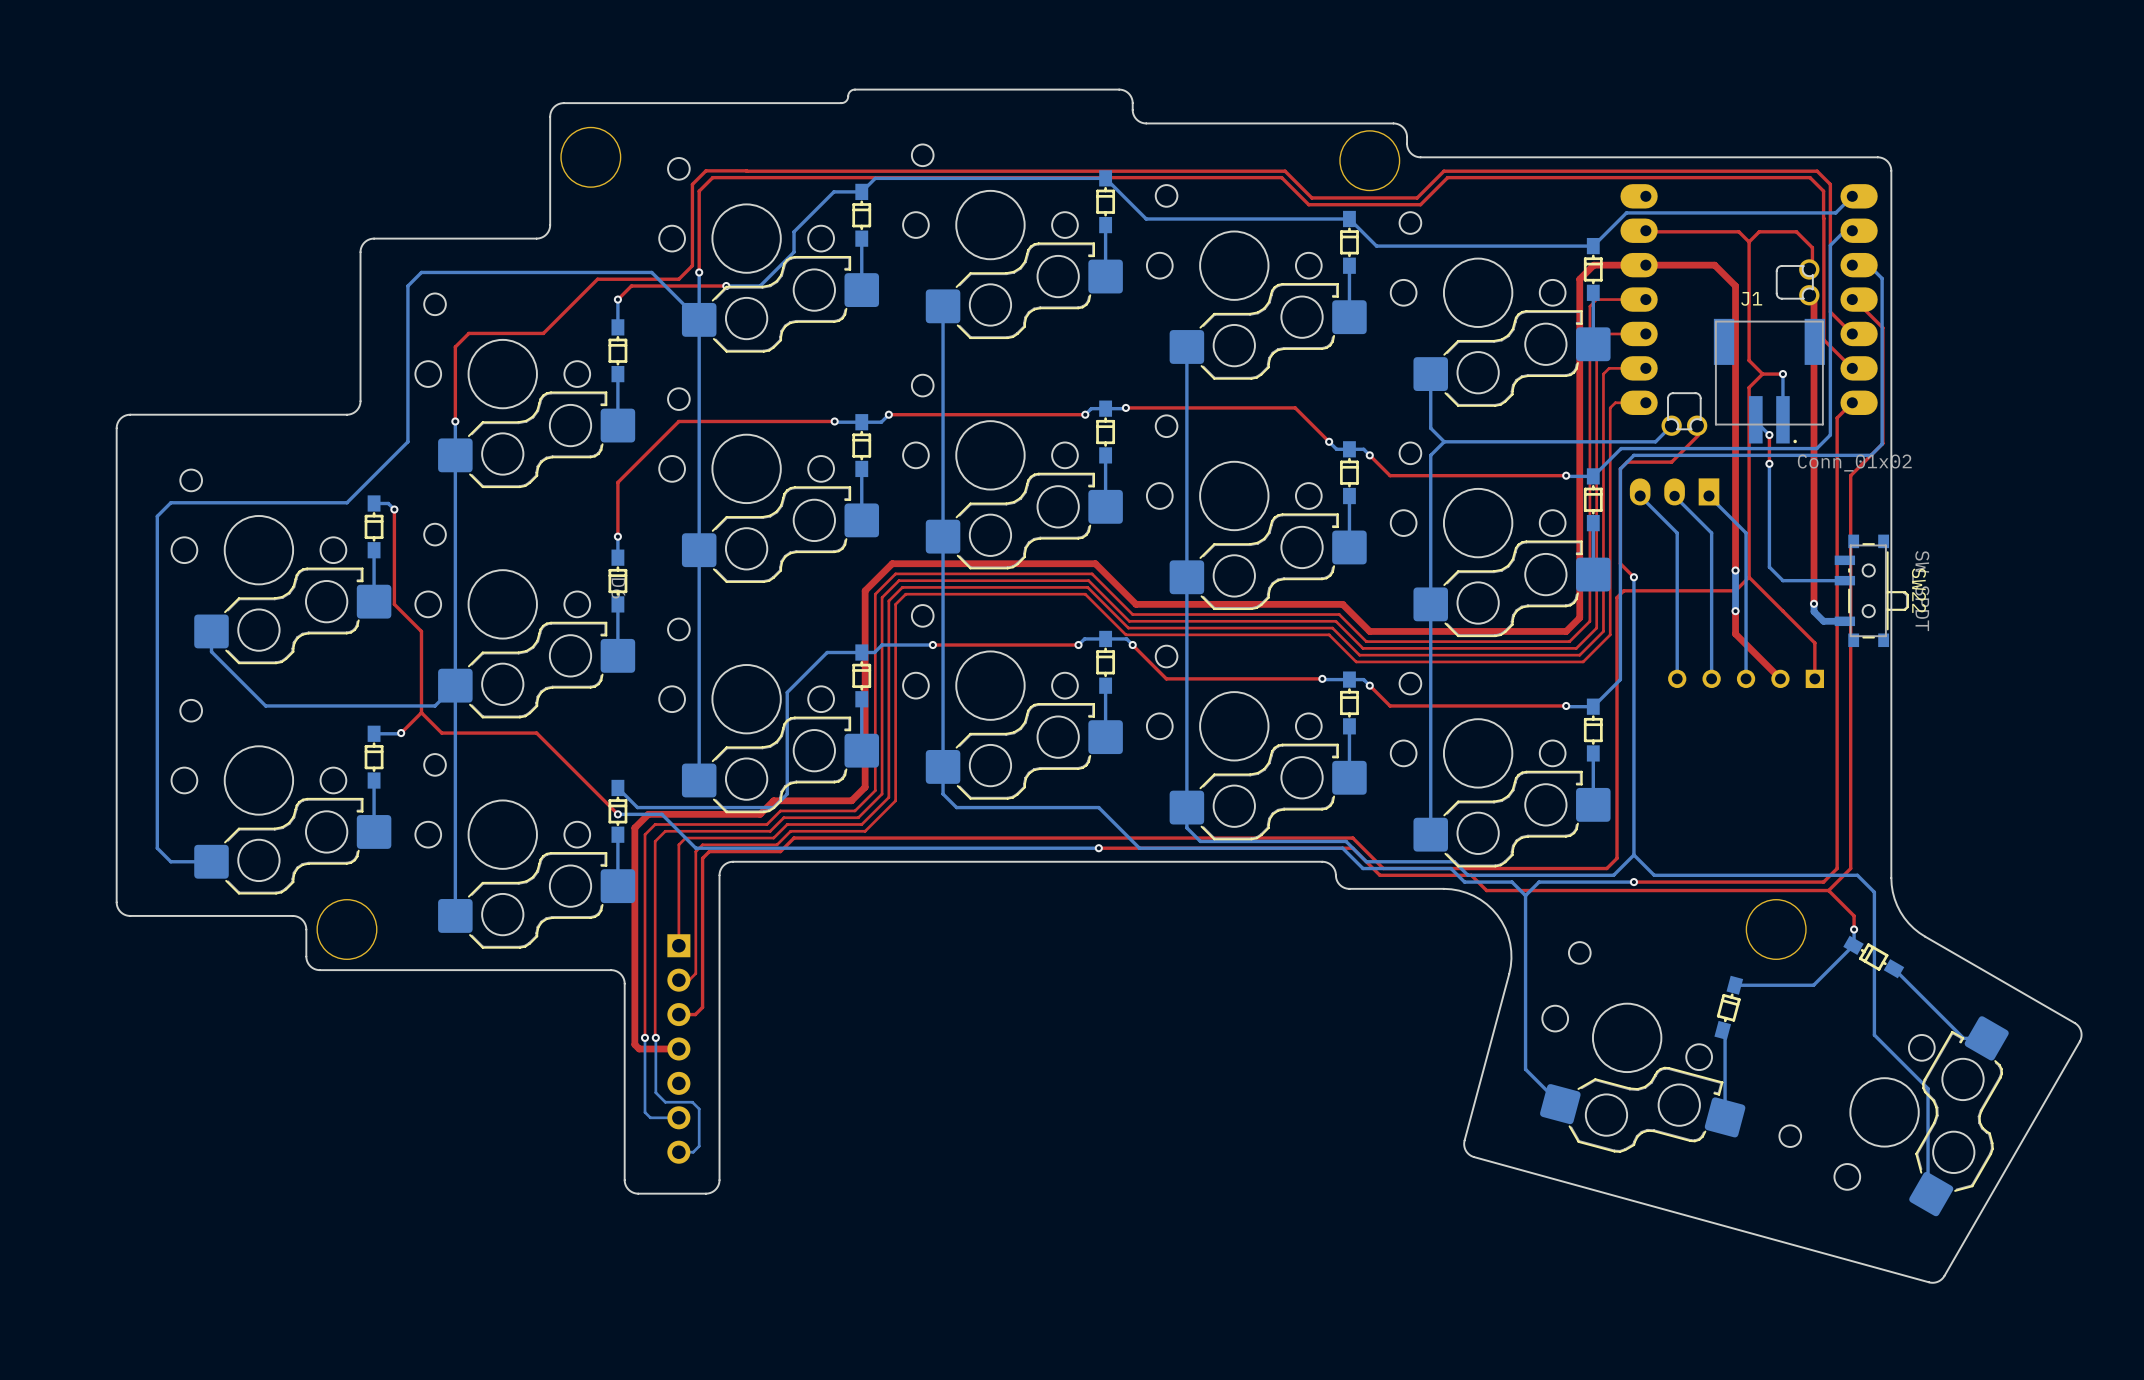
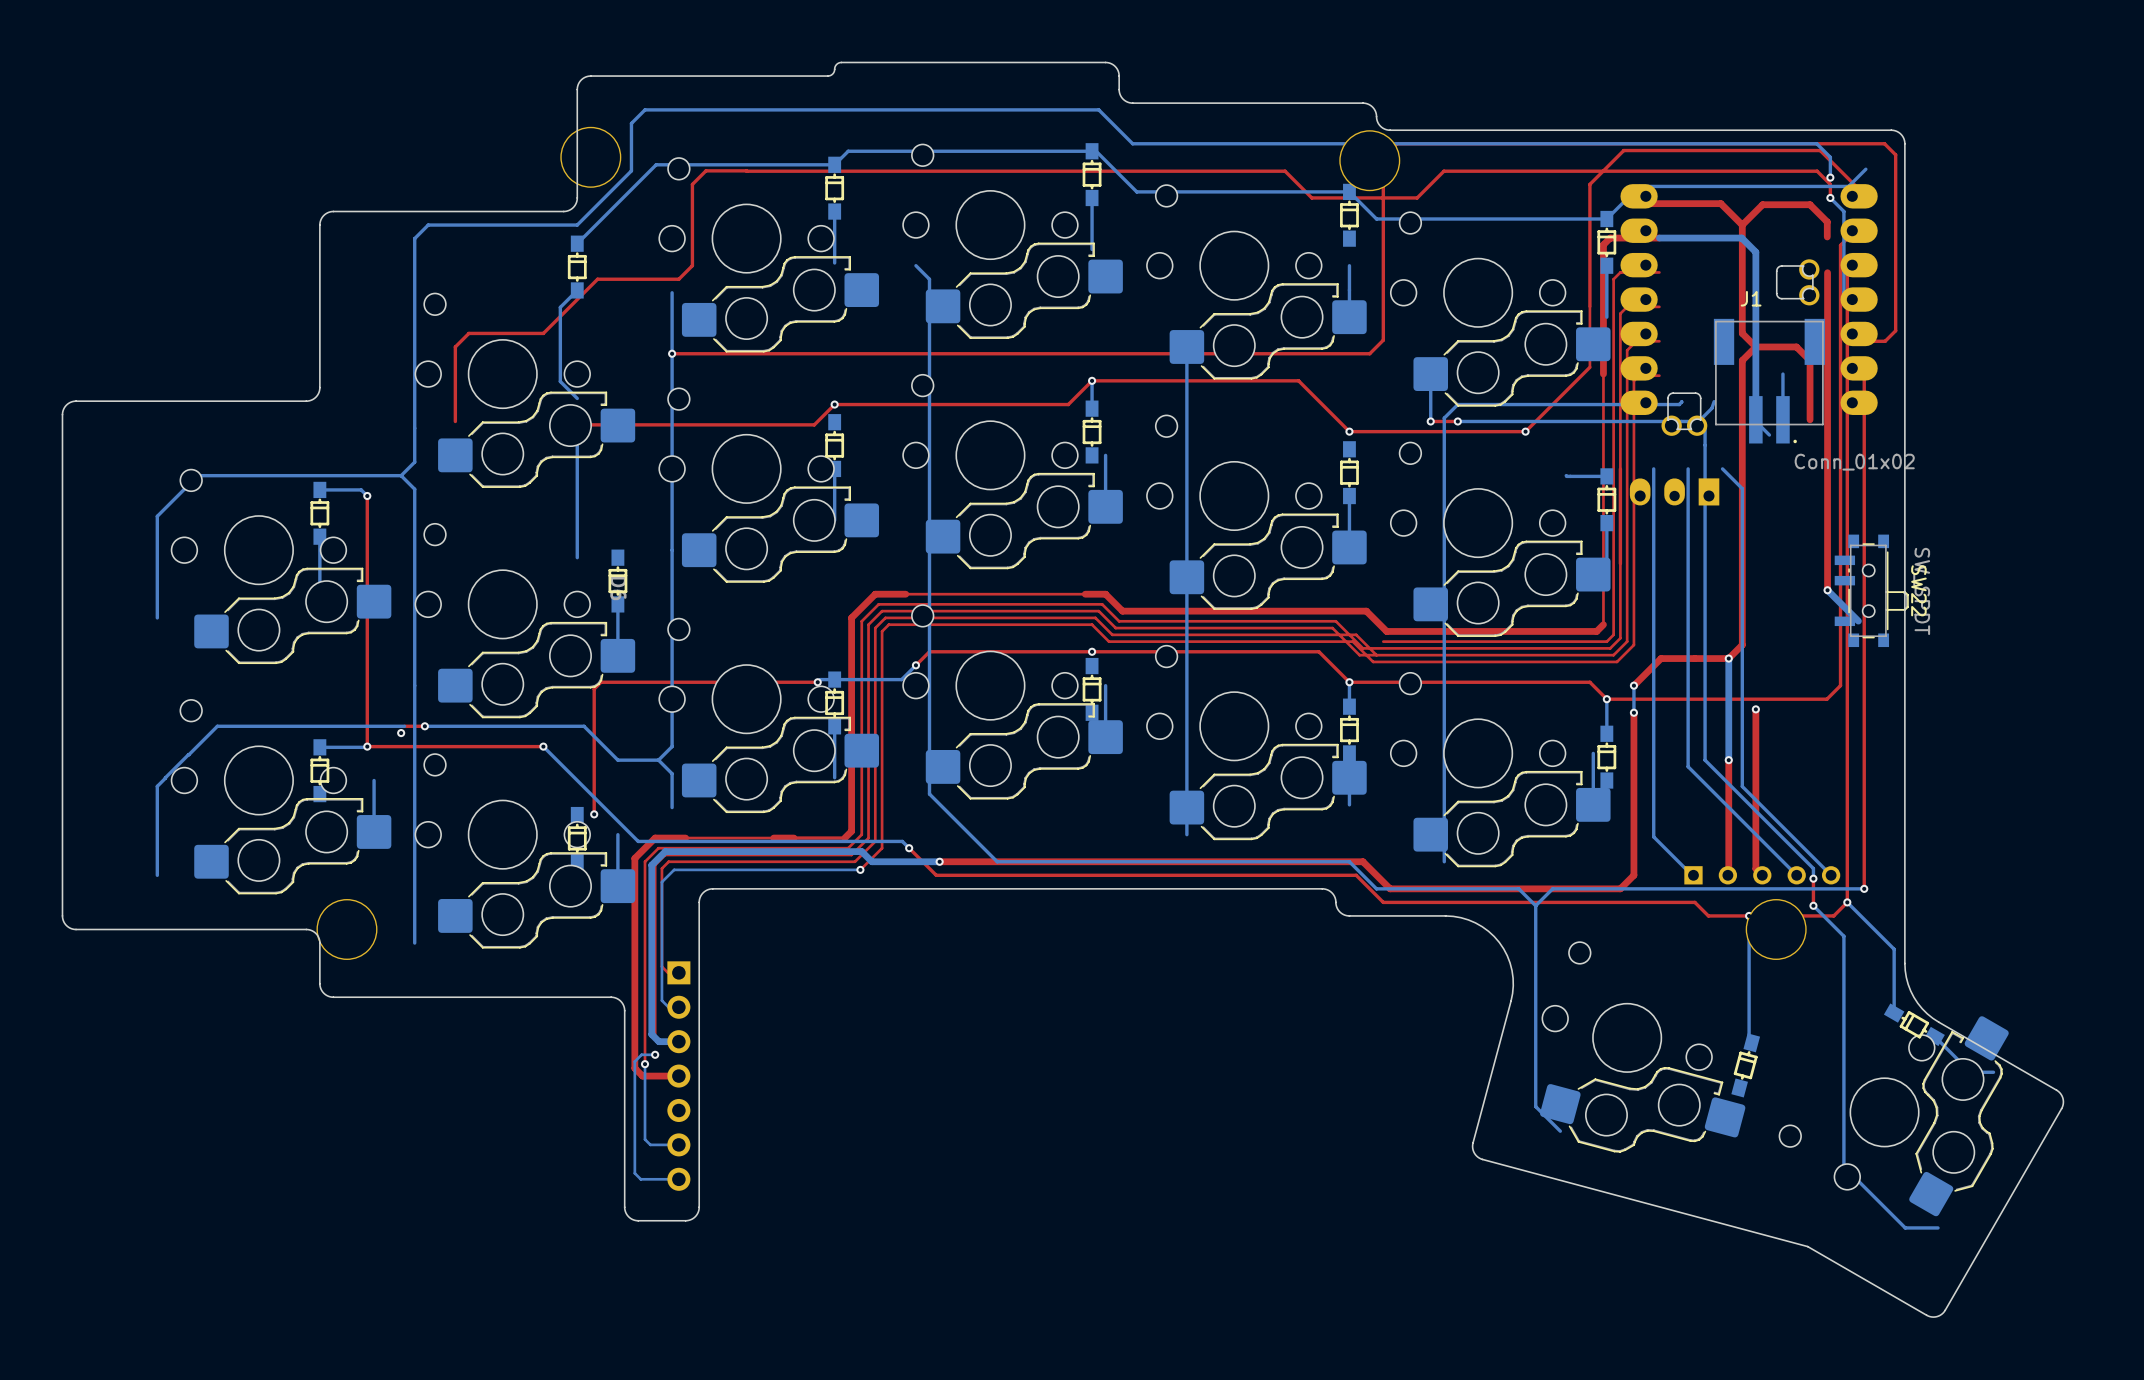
bottom track: none -> (1865, 169) (1848, 186) (1639, 186) (1606, 218) (1376, 218) (1349, 191) (1136, 191) (1096, 151) (848, 151) (834, 164) (656, 164) (577, 243)
bottom track: none -> (1830, 177) (1830, 157) (1816, 143) (1132, 143) (1098, 109) (645, 109) (631, 123) (631, 170) (577, 225) (428, 225) (414, 238) (414, 462) (401, 475)
via: none -> (1830, 177)
bottom track: (1852, 196) (1835, 212) (1626, 212) (1593, 246) (1376, 246) (1349, 218) (1146, 218) (1105, 178) (875, 178) (861, 191) (833, 191) (794, 231) (794, 252) (760, 286) (726, 286) -> none
top track: (1830, 197) (1830, 312) (1852, 333) -> none
bottom track: none -> (1830, 197) (1843, 211) (1843, 292) (1858, 306) (1865, 306)
via: none -> (1830, 197)
part position: (1105, 201) -> (1092, 174)
top track: none -> (1645, 203) (1720, 203) (1742, 225)
part position: (861, 215) -> (834, 188)
top track: (1823, 218) (1823, 191) (1810, 177) (1447, 177) (1420, 204) (1308, 204) (1281, 177) (712, 177) (699, 191) (699, 272) -> none
top track: (1823, 218) (1823, 339) (1852, 368) -> none
bottom track: (1105, 225) (1105, 276) -> (1092, 198) (1092, 249)
top track: none -> (1742, 225) (1742, 333) (1755, 346)
top track: none -> (1742, 225) (1762, 204) (1810, 204) (1827, 221) (1827, 236)
top track: (1645, 230) (1738, 231) (1749, 241) -> none
bottom track: (1852, 230) (1845, 230) (1830, 245) (1830, 435) (1816, 448) (1621, 448) (1593, 476) -> (1606, 476) (1593, 476)
bottom track: (861, 238) (861, 290) -> (834, 211) (834, 262)
bottom track: none -> (1659, 238) (1741, 238) (1755, 252) (1755, 419)
top track: none -> (1865, 238) (1847, 238) (1840, 245) (1840, 685) (1826, 699) (1606, 699) (1589, 682) (1349, 682) (1318, 651) (929, 651) (915, 665)
top track: (1749, 241) (1749, 360) (1762, 374) -> none
top track: (1749, 241) (1759, 231) (1796, 231) (1812, 247) (1812, 266) -> none
part position: (1349, 242) -> (1349, 215)
bottom track: (1852, 265) (1868, 265) (1882, 278) (1882, 444) (1871, 455) (1633, 455) (1620, 468) (1620, 679) (1593, 706) (1566, 705) -> none
part position: (1593, 269) -> (1606, 242)
bottom track: (699, 272) (699, 780) -> none
via: (699, 272) -> none
top track: none -> (1827, 272) (1827, 590)
top track: none -> (1865, 272) (1850, 272) (1847, 275) (1847, 902) (1833, 915) (1708, 915) (1694, 902) (1383, 902) (1356, 875) (936, 875) (909, 848)
top track: (726, 286) (631, 286) (617, 299) -> none
via: (726, 286) -> none
bottom track: none -> (577, 290) (560, 307) (560, 381) (577, 398)
bottom track: none -> (672, 292) (672, 746) (658, 760)
bottom track: (1593, 292) (1593, 344) -> (1606, 265) (1606, 317)
bottom track: (617, 299) (617, 327) -> none
via: (617, 299) -> none
top track: (1645, 299) (1596, 299) (1589, 306) -> (1865, 203) (1865, 196) (1820, 150) (1623, 150) (1589, 184) (1589, 306)
top track: (1814, 299) (1814, 603) -> none
top track: (1852, 299) (1854, 299) (1882, 327) (1882, 443) (1850, 475) (1850, 868) (1828, 890) -> none
bottom track: (943, 306) (943, 794) (956, 807) (1098, 807) (1139, 848) (1342, 848) (1363, 868) (1451, 868) (1464, 882) (1512, 882) (1518, 888) -> (915, 265) (929, 279) (929, 794) (997, 861) (1349, 861) (1376, 888) (1518, 888)
bottom track: (699, 319) (651, 272) (421, 272) (407, 286) (407, 441) (346, 502) (170, 502) -> (401, 475) (197, 475) (170, 502)
top track: (1645, 333) (1602, 333) (1596, 340) (1596, 628) (1576, 648) -> none
top track: none -> (1659, 341) (1636, 341) (1627, 350) (1627, 641) (1613, 655) (1579, 655)
top track: none -> (1865, 341) (1885, 341) (1895, 330) (1895, 154) (1884, 143) (1396, 143) (1383, 157) (1383, 340) (1369, 353) (672, 353)
top track: none -> (1755, 346) (1796, 346) (1810, 360) (1810, 419)
top track: none -> (1755, 346) (1742, 360) (1742, 645) (1728, 658) (1661, 658) (1633, 685)
part position: (617, 350) -> (577, 267)
via: none -> (672, 353)
top track: (1589, 367) (1589, 621) (1569, 641) -> (1659, 272) (1620, 272) (1613, 279) (1613, 634) (1606, 641) (1569, 641)
top track: none -> (1589, 367) (1525, 431) (1349, 431) (1298, 380) (1092, 380) (1068, 404) (834, 404) (814, 424) (577, 424)
top track: (1645, 368) (1609, 368) (1603, 374) -> (1659, 238) (1610, 238) (1603, 244) (1603, 374)
bottom track: (617, 374) (617, 425) -> none
top track: (1762, 374) (1749, 387) (1749, 577) -> none
top track: (1782, 374) (1762, 374) -> none
via: (1782, 374) -> none
top track: none -> (1865, 375) (1864, 377) (1864, 888)
bottom track: none -> (1092, 380) (1092, 408)
via: none -> (1092, 380)
bottom track: none -> (1681, 401) (1679, 404) (1457, 404) (1444, 418) (1444, 861)
bottom track: none -> (1714, 401) (1711, 408) (1698, 421)
top track: (1645, 402) (1615, 402) (1610, 407) (1610, 634) (1583, 661) -> (1659, 375) (1639, 375) (1633, 380) (1633, 645) (1617, 661) (1583, 661)
top track: (1852, 402) (1837, 417) (1837, 868) (1823, 882) (1633, 882) -> none
top track: (1125, 407) (1295, 407) (1329, 441) -> none
bottom track: (1125, 407) (1091, 408) (1085, 414) -> none
via: (1125, 407) -> none
bottom track: (888, 414) (881, 422) (834, 421) -> none
via: (888, 414) -> none
top track: (1085, 414) (888, 414) -> none
via: (1085, 414) -> none
bottom track: (455, 421) (455, 915) -> none
via: (455, 421) -> none
top track: (834, 421) (678, 421) (617, 482) (617, 536) -> none
via position: (834, 421) -> (834, 404)
bottom track: (1430, 421) (1430, 428) (1444, 441) -> none
via: none -> (1430, 421)
top track: none -> (1457, 421) (1430, 421)
via: none -> (1457, 421)
bottom track: none -> (1698, 421) (1457, 421)
bottom track: none -> (1698, 421) (1705, 427) (1705, 760) (1813, 868) (1813, 878)
bottom track: none -> (577, 424) (577, 557)
bottom track: (1668, 428) (1655, 441) (1444, 441) -> none
via: none -> (1349, 431)
part position: (1105, 432) -> (1092, 432)
top track: (1698, 435) (1671, 462) (1627, 462) (1620, 468) -> (1659, 306) (1627, 306) (1620, 313) (1620, 468)
top track: (1769, 435) (1769, 463) -> none
via: (1769, 435) -> none
bottom track: (1329, 441) (1336, 449) (1363, 449) (1369, 455) -> none
via: (1329, 441) -> none
bottom track: (1444, 441) (1430, 455) (1430, 834) -> none
part position: (861, 445) -> (834, 445)
top track: (1369, 455) (1390, 475) (1566, 475) -> none
via: (1369, 455) -> none
bottom track: (1769, 463) (1769, 567) (1782, 580) (1844, 580) -> none
via: (1769, 463) -> none
bottom track: (861, 468) (861, 520) -> (834, 468) (834, 520)
bottom track: none -> (1688, 468) (1688, 766) (1796, 875)
bottom track: none -> (1722, 468) (1742, 488) (1742, 786) (1831, 875)
bottom track: none -> (401, 475) (414, 489) (414, 943)
via position: (1566, 475) -> (1525, 431)
bottom track: none -> (319, 489) (361, 489) (367, 495)
top track: none -> (367, 495) (367, 746) (543, 746)
bottom track: (1640, 495) (1677, 533) (1677, 678) -> none
bottom track: (1674, 495) (1711, 533) (1711, 678) -> none
bottom track: (1708, 495) (1746, 533) (1746, 678) -> none
part position: (1593, 499) -> (1606, 499)
bottom track: (374, 503) (388, 503) (394, 509) -> none
top track: (394, 509) (394, 604) (421, 631) (421, 712) -> none
via position: (394, 509) -> (367, 495)
bottom track: (1593, 523) (1593, 574) -> (1606, 523) (1606, 574)
part position: (374, 526) -> (319, 513)
bottom track: (617, 536) (617, 557) -> none
via: (617, 536) -> none
bottom track: (374, 550) (374, 601) -> (319, 536) (319, 588)
top track: (1620, 563) (1633, 577) -> (1620, 563) (1620, 638) (1610, 648) (1576, 648)
top track: (1735, 570) (1735, 286) (1714, 265) (1593, 265) (1579, 279) (1579, 617) (1566, 631) -> none
bottom track: (1735, 570) (1735, 611) -> none
via: (1735, 570) -> none
bottom track: (1633, 577) (1633, 685) -> none
via: (1633, 577) -> none
top track: (1749, 577) (1735, 590) (1623, 590) (1617, 597) (1617, 858) (1606, 868) (1383, 868) (1352, 838) (844, 838) -> none
top track: (1749, 577) (1814, 643) (1814, 678) -> none
bottom track: none -> (1827, 590) (1858, 621)
top track: (905, 594) (895, 604) (895, 800) (865, 831) (790, 831) (777, 844) (702, 844) (695, 851) (695, 973) (689, 980) (678, 980) -> (905, 594) (875, 594) (851, 617) (851, 831) (844, 838)
top track: (1085, 594) (1125, 634) -> (875, 628) (885, 617) (1095, 617) (1112, 634) (1125, 634)
bottom track: (1814, 603) (1814, 611) (1823, 621) (1844, 621) -> none
via position: (1814, 603) -> (1827, 590)
top track: (1735, 611) (1735, 633) (1780, 678) -> none
via: (1735, 611) -> none
bottom track: (157, 617) (157, 786) -> (404, 726) (217, 726) (157, 786)
top track: (1129, 621) (1088, 580) (899, 580) (882, 597) (882, 631) -> (1373, 661) (1352, 641) (1108, 641) (1092, 624) (888, 624) (882, 631)
top track: none -> (1129, 621) (1119, 621) (1102, 604) (878, 604) (861, 621) (861, 834) (848, 848) (658, 848) (645, 861)
top track: (1603, 624) (1603, 631) (1579, 655) -> (1603, 624) (1596, 631) (1566, 631)
top track: (875, 628) (875, 594) (895, 573) (1092, 573) (1132, 614) (1339, 614) (1366, 641) (1383, 641) -> none
top track: (1128, 628) (1087, 587) (902, 587) (888, 600) (888, 797) (861, 824) (787, 824) (773, 838) -> (1128, 628) (1115, 628) (1098, 611) (882, 611) (868, 624) (868, 838) (851, 854) (665, 854) (655, 865)
bottom track: (211, 631) (211, 651) (265, 705) (435, 705) (455, 685) -> none
top track: (1386, 631) (1369, 631) (1342, 604) (1136, 604) (1095, 563) (892, 563) (865, 590) (865, 787) (851, 800) (773, 800) (760, 814) (648, 814) (634, 827) (634, 858) -> (1386, 631) (1366, 611) (1122, 611) (1105, 594) (1085, 594)
top track: (1329, 634) (1356, 661) (1373, 661) -> (1329, 634) (1356, 634) (1376, 655)
bottom track: (932, 645) (882, 645) (874, 652) (827, 652) (787, 692) (787, 794) (773, 807) (637, 807) (617, 787) -> none
via position: (932, 645) -> (915, 665)
top track: (1078, 645) (932, 645) -> none
via position: (1078, 645) -> (1092, 651)
top track: (1132, 645) (1166, 678) (1322, 678) -> none
bottom track: (1132, 645) (1126, 638) (1084, 638) (1078, 645) -> none
via: (1132, 645) -> none
bottom track: none -> (1728, 658) (1728, 760)
via: none -> (1728, 658)
part position: (1105, 662) -> (1092, 689)
bottom track: none -> (915, 665) (901, 679) (820, 679) (817, 682)
part position: (861, 675) -> (834, 702)
bottom track: (1322, 678) (1363, 679) (1369, 685) -> none
via: (1322, 678) -> none
part rotation: 0° (1746, 678) -> 180° (1762, 875)
part position: (1746, 678) -> (1762, 875)
top track: none -> (817, 682) (600, 682) (594, 689) (594, 814)
via: none -> (817, 682)
bottom track: none -> (1349, 682) (1349, 706)
via: none -> (1349, 682)
top track: (1369, 685) (1390, 705) (1566, 705) -> none
via: (1369, 685) -> none
via: none -> (1633, 685)
bottom track: (861, 699) (861, 750) -> (834, 726) (834, 777)
bottom track: none -> (1606, 699) (1606, 733)
via: none -> (1606, 699)
part position: (1349, 702) -> (1349, 730)
via: (1566, 705) -> none
top track: none -> (1755, 709) (1755, 868) (1762, 875)
via: none -> (1755, 709)
top track: (421, 712) (441, 733) (536, 733) (617, 814) -> none
top track: (421, 712) (401, 733) -> none
top track: none -> (1633, 712) (1633, 875) (1620, 888) (1390, 888) (1363, 861) (939, 861)
bottom track: (1633, 712) (1633, 854) -> none
via: none -> (1633, 712)
top track: none -> (424, 726) (404, 726)
bottom track: none -> (424, 726) (584, 726) (617, 760) (658, 760)
via: none -> (424, 726)
bottom track: (1349, 726) (1349, 753) -> (1349, 777) (1349, 804)
part position: (1593, 730) -> (1606, 757)
bottom track: (401, 733) (374, 733) -> none
bottom track: none -> (367, 746) (319, 747)
via: none -> (367, 746)
bottom track: none -> (543, 746) (638, 841) (902, 841) (909, 848)
via: none -> (543, 746)
part position: (374, 757) -> (319, 770)
bottom track: none -> (658, 760) (672, 773) (672, 807)
top track: none -> (1728, 760) (1727, 876)
via: none -> (1728, 760)
top track: (875, 790) (854, 810) (780, 810) (766, 824) (655, 824) (645, 834) (645, 861) -> (875, 790) (875, 841) (854, 861) (668, 861) (661, 868) (661, 966) (668, 972) (678, 972)
top track: (882, 794) (858, 817) (783, 817) (770, 831) (665, 831) (655, 841) (655, 865) -> (882, 794) (882, 848) (860, 869)
part position: (617, 811) -> (577, 838)
bottom track: (617, 814) (661, 814) (695, 848) (1098, 848) -> none
via position: (617, 814) -> (594, 814)
bottom track: (1186, 827) (1200, 841) (1346, 841) (1366, 861) (1454, 861) (1467, 875) (1613, 875) (1633, 854) -> (1186, 827) (1186, 834)
top track: (685, 838) (678, 844) (678, 945) -> (685, 838) (655, 838) (634, 858)
top track: (794, 838) (780, 851) (709, 851) (702, 858) (702, 1007) (695, 1014) (678, 1014) -> (794, 838) (773, 838)
bottom track: (157, 848) (170, 861) (211, 861) -> (157, 848) (157, 875)
via: none -> (909, 848)
top track: (1098, 848) (1352, 848) (1379, 875) (1471, 875) (1486, 890) (1828, 890) -> none
via: (1098, 848) -> none
bottom track: (1633, 854) (1654, 875) (1692, 875) -> (1653, 468) (1653, 836) (1692, 875)
bottom track: none -> (939, 861) (871, 861) (861, 851) (665, 851) (651, 865) (651, 1034) (658, 1041) (678, 1041)
via: none -> (939, 861)
bottom track: none -> (860, 869) (674, 869) (661, 882) (661, 1000) (668, 1007) (678, 1007)
via: none -> (860, 869)
bottom track: (1693, 875) (1857, 875) (1874, 892) (1874, 1035) (1928, 1088) (1928, 1190) (1931, 1194) -> none
top track: none -> (1813, 878) (1813, 905)
via: none -> (1813, 878)
bottom track: (1633, 882) (1539, 882) (1525, 895) (1525, 1069) (1560, 1104) -> none
via: (1633, 882) -> none
bottom track: none -> (1864, 888) (1552, 888) (1535, 905)
via: none -> (1864, 888)
top track: (1828, 890) (1854, 915) (1854, 929) -> none
bottom track: none -> (1525, 895) (1535, 905)
bottom track: none -> (1847, 902) (1894, 949) (1894, 1013)
via: none -> (1847, 902)
bottom track: none -> (1535, 905) (1535, 1106) (1560, 1131)
bottom track: none -> (1813, 905) (1843, 936) (1843, 1166) (1905, 1227) (1938, 1227)
via: none -> (1813, 905)
bottom track: none -> (1749, 915) (1749, 1040) (1751, 1042)
via: none -> (1749, 915)
bottom track: (1854, 929) (1854, 944) (1813, 985) (1734, 985) -> none
via: (1854, 929) -> none
part position: (1873, 957) -> (1914, 1024)
bottom track: (1893, 968) (1963, 1038) (1986, 1038) -> none
part position: (1728, 1007) -> (1745, 1065)
board edge: (624, 1010) (624, 980) (620, 974) (614, 970) (318, 970) (311, 967) (307, 961) (305, 926) (303, 921) (297, 916) (128, 915) (120, 911) (116, 903) (118, 422) (123, 416) (130, 414) (346, 414) (355, 411) (360, 401) (360, 252) (362, 244) (368, 239) (374, 238) (536, 238) (545, 235) (550, 225) (550, 115) (556, 105) (563, 103) (841, 103) (846, 100) (850, 91) (854, 89) (1119, 89) (1129, 94) (1134, 115) (1139, 121) (1144, 123) (1396, 123) (1405, 131) (1409, 150) (1419, 157) (1877, 157) (1884, 159) (1889, 163) (1891, 170) (1892, 892) (1904, 917) (1919, 932) (2074, 1023) (2079, 1027) (2081, 1034) (2079, 1041) (1941, 1279) (1936, 1282) (1929, 1282) (1469, 1154) (1464, 1147) (1464, 1140) (1510, 966) (1510, 943) (1505, 928) (1492, 909) (1480, 899) (1466, 892) (1443, 888) (1346, 888) (1337, 882) (1332, 866) (1323, 861) (727, 863) (721, 868) (719, 875) (718, 1184) (714, 1190) (707, 1193) (638, 1193) (628, 1189) (624, 1180) -> (624, 1010) (620, 1001) (611, 997) (331, 997) (324, 994) (320, 988) (319, 940) (315, 933) (309, 929) (76, 929) (68, 927) (63, 920) (63, 410) (68, 403) (76, 401) (306, 401) (314, 398) (319, 387) (319, 223) (326, 213) (333, 211) (568, 210) (574, 206) (577, 199) (577, 88) (579, 82) (584, 77) (827, 76) (833, 73) (836, 64) (841, 62) (1107, 62) (1117, 68) (1119, 94) (1124, 100) (1129, 102) (1364, 103) (1374, 109) (1379, 125) (1388, 130) (1891, 130) (1897, 131) (1902, 136) (1904, 143) (1906, 977) (1917, 1003) (1932, 1018) (2056, 1090) (2061, 1094) (2063, 1101) (2061, 1108) (1941, 1314) (1935, 1316) (1926, 1315) (1807, 1246) (1477, 1157) (1473, 1151) (1473, 1142) (1512, 993) (1512, 970) (1503, 948) (1488, 931) (1475, 922) (1460, 917) (1344, 915) (1337, 909) (1332, 893) (1323, 888) (706, 890) (701, 895) (699, 902) (697, 1213) (692, 1218) (687, 1220) (632, 1219) (625, 1210) (624, 1180)
bottom track: (1722, 1030) (1725, 1032) (1725, 1117) -> none
bottom track: none -> (1934, 1036) (1970, 1072) (1993, 1072)
top track: none -> (645, 1037) (645, 1064)
bottom track: (645, 1037) (645, 1064) -> none
via: (645, 1037) -> none
bottom track: (655, 1037) (655, 1092) (665, 1102) (692, 1102) (699, 1108) (699, 1146) (693, 1152) (678, 1152) -> none
via: (655, 1037) -> none
top track: (634, 1044) (639, 1048) (678, 1048) -> (634, 1044) (634, 1068) (642, 1076) (678, 1076)
part position: (678, 1048) -> (678, 1076)
bottom track: none -> (655, 1054) (641, 1054) (634, 1061) (634, 1173) (640, 1179) (678, 1179)
via: none -> (655, 1054)
via: none -> (645, 1064)
bottom track: (645, 1112) (650, 1117) (678, 1117) -> (645, 1112) (645, 1139) (650, 1144) (678, 1144)

